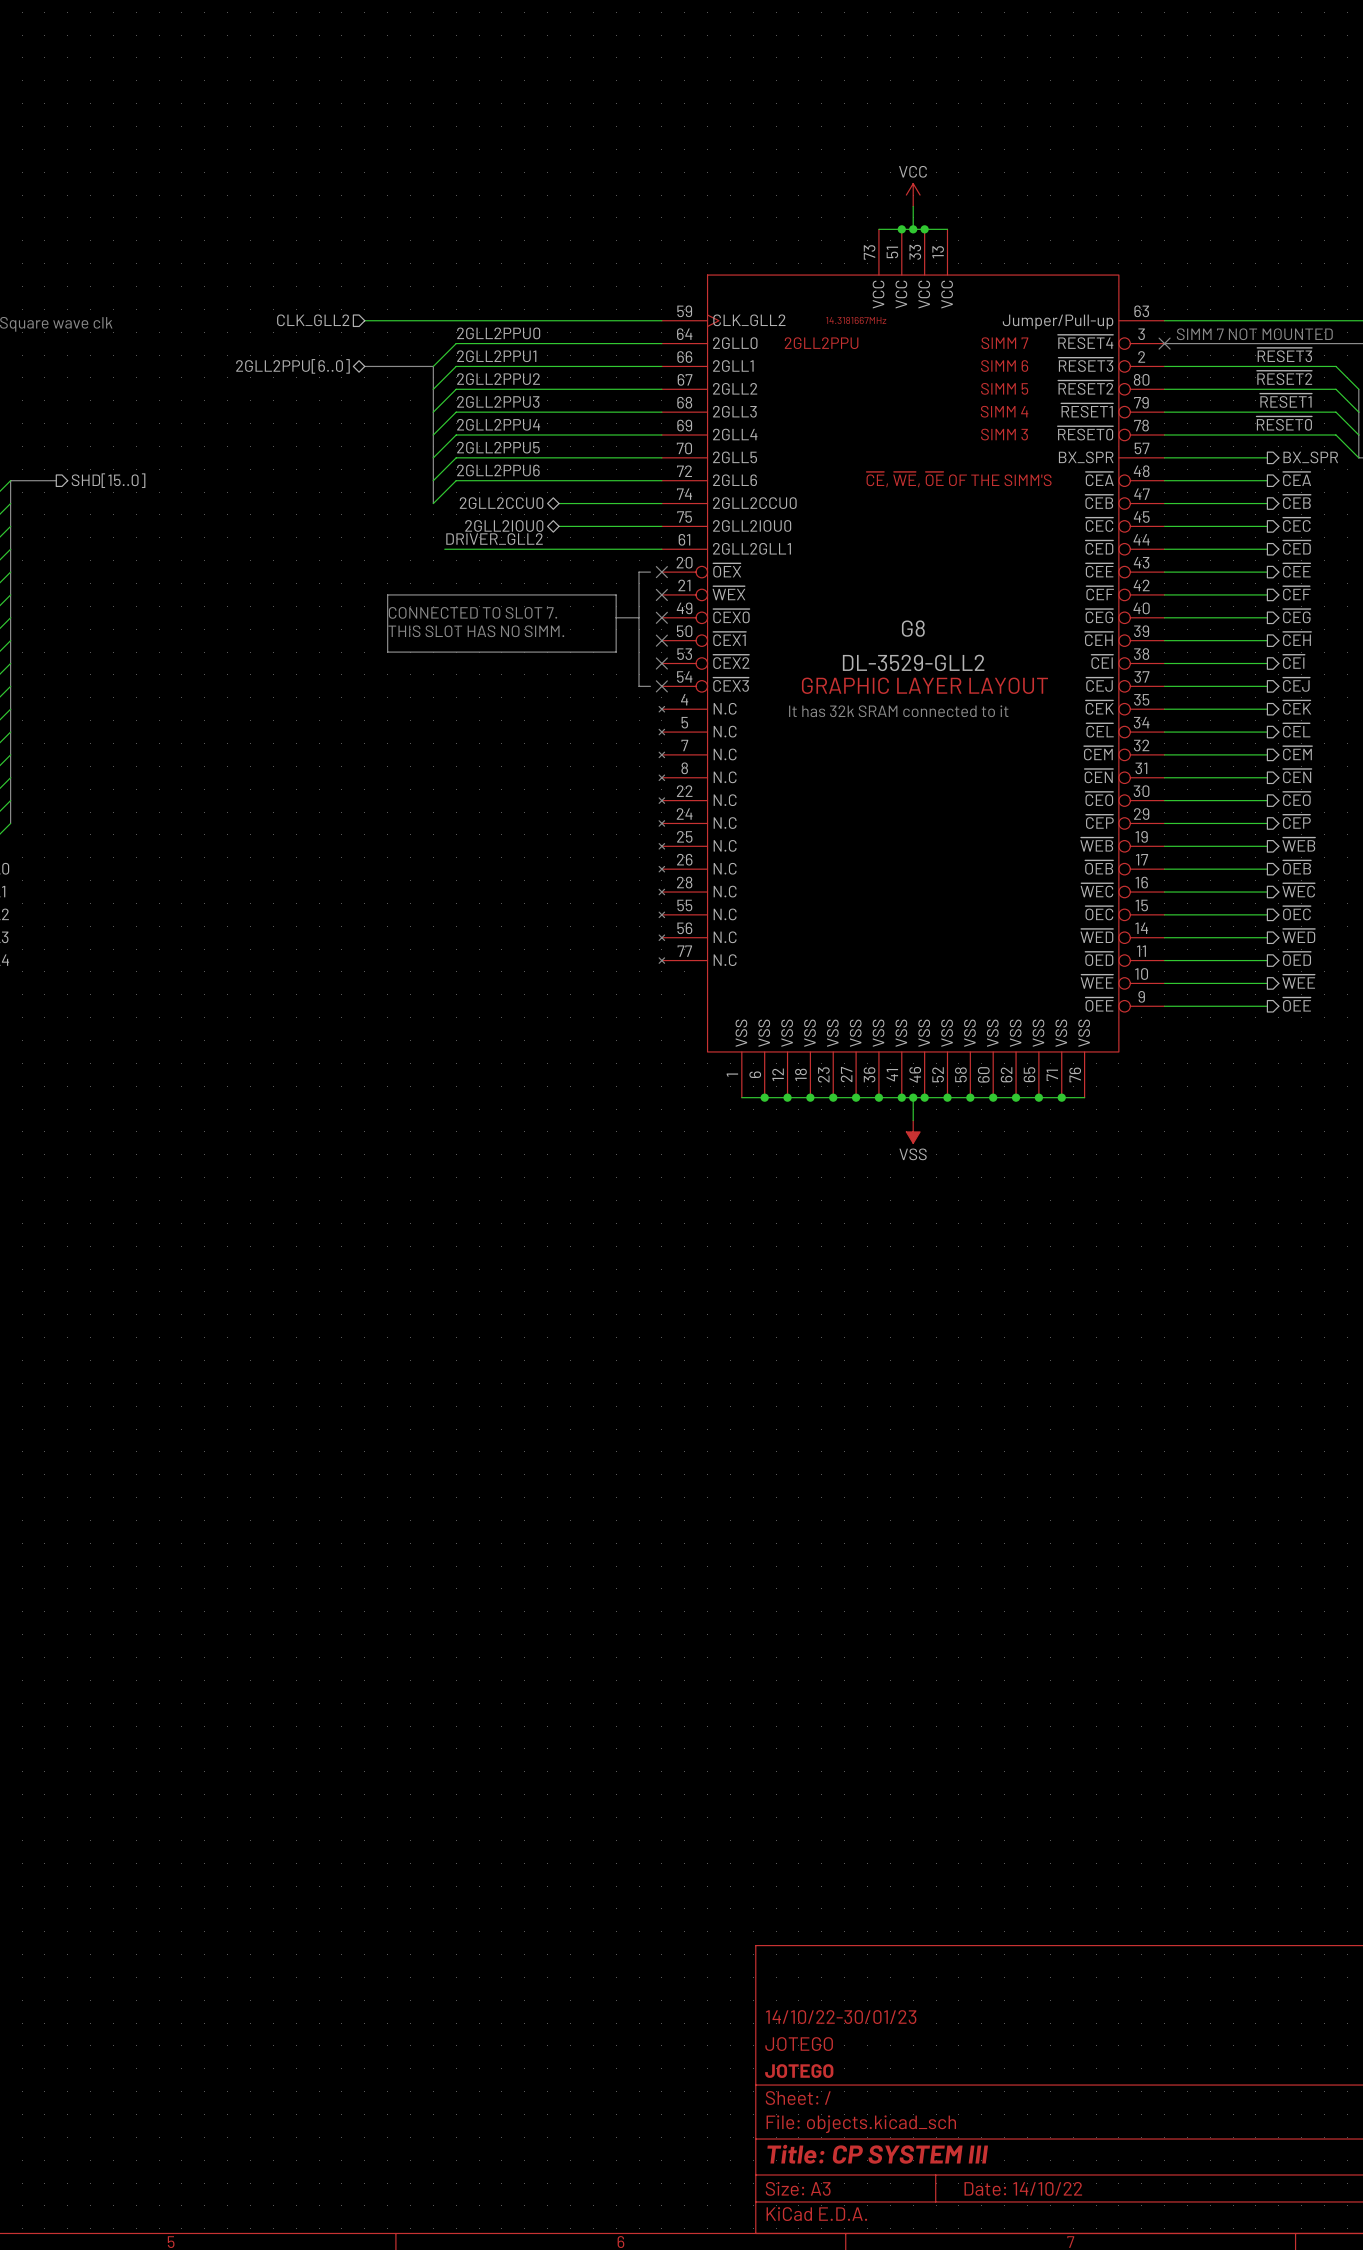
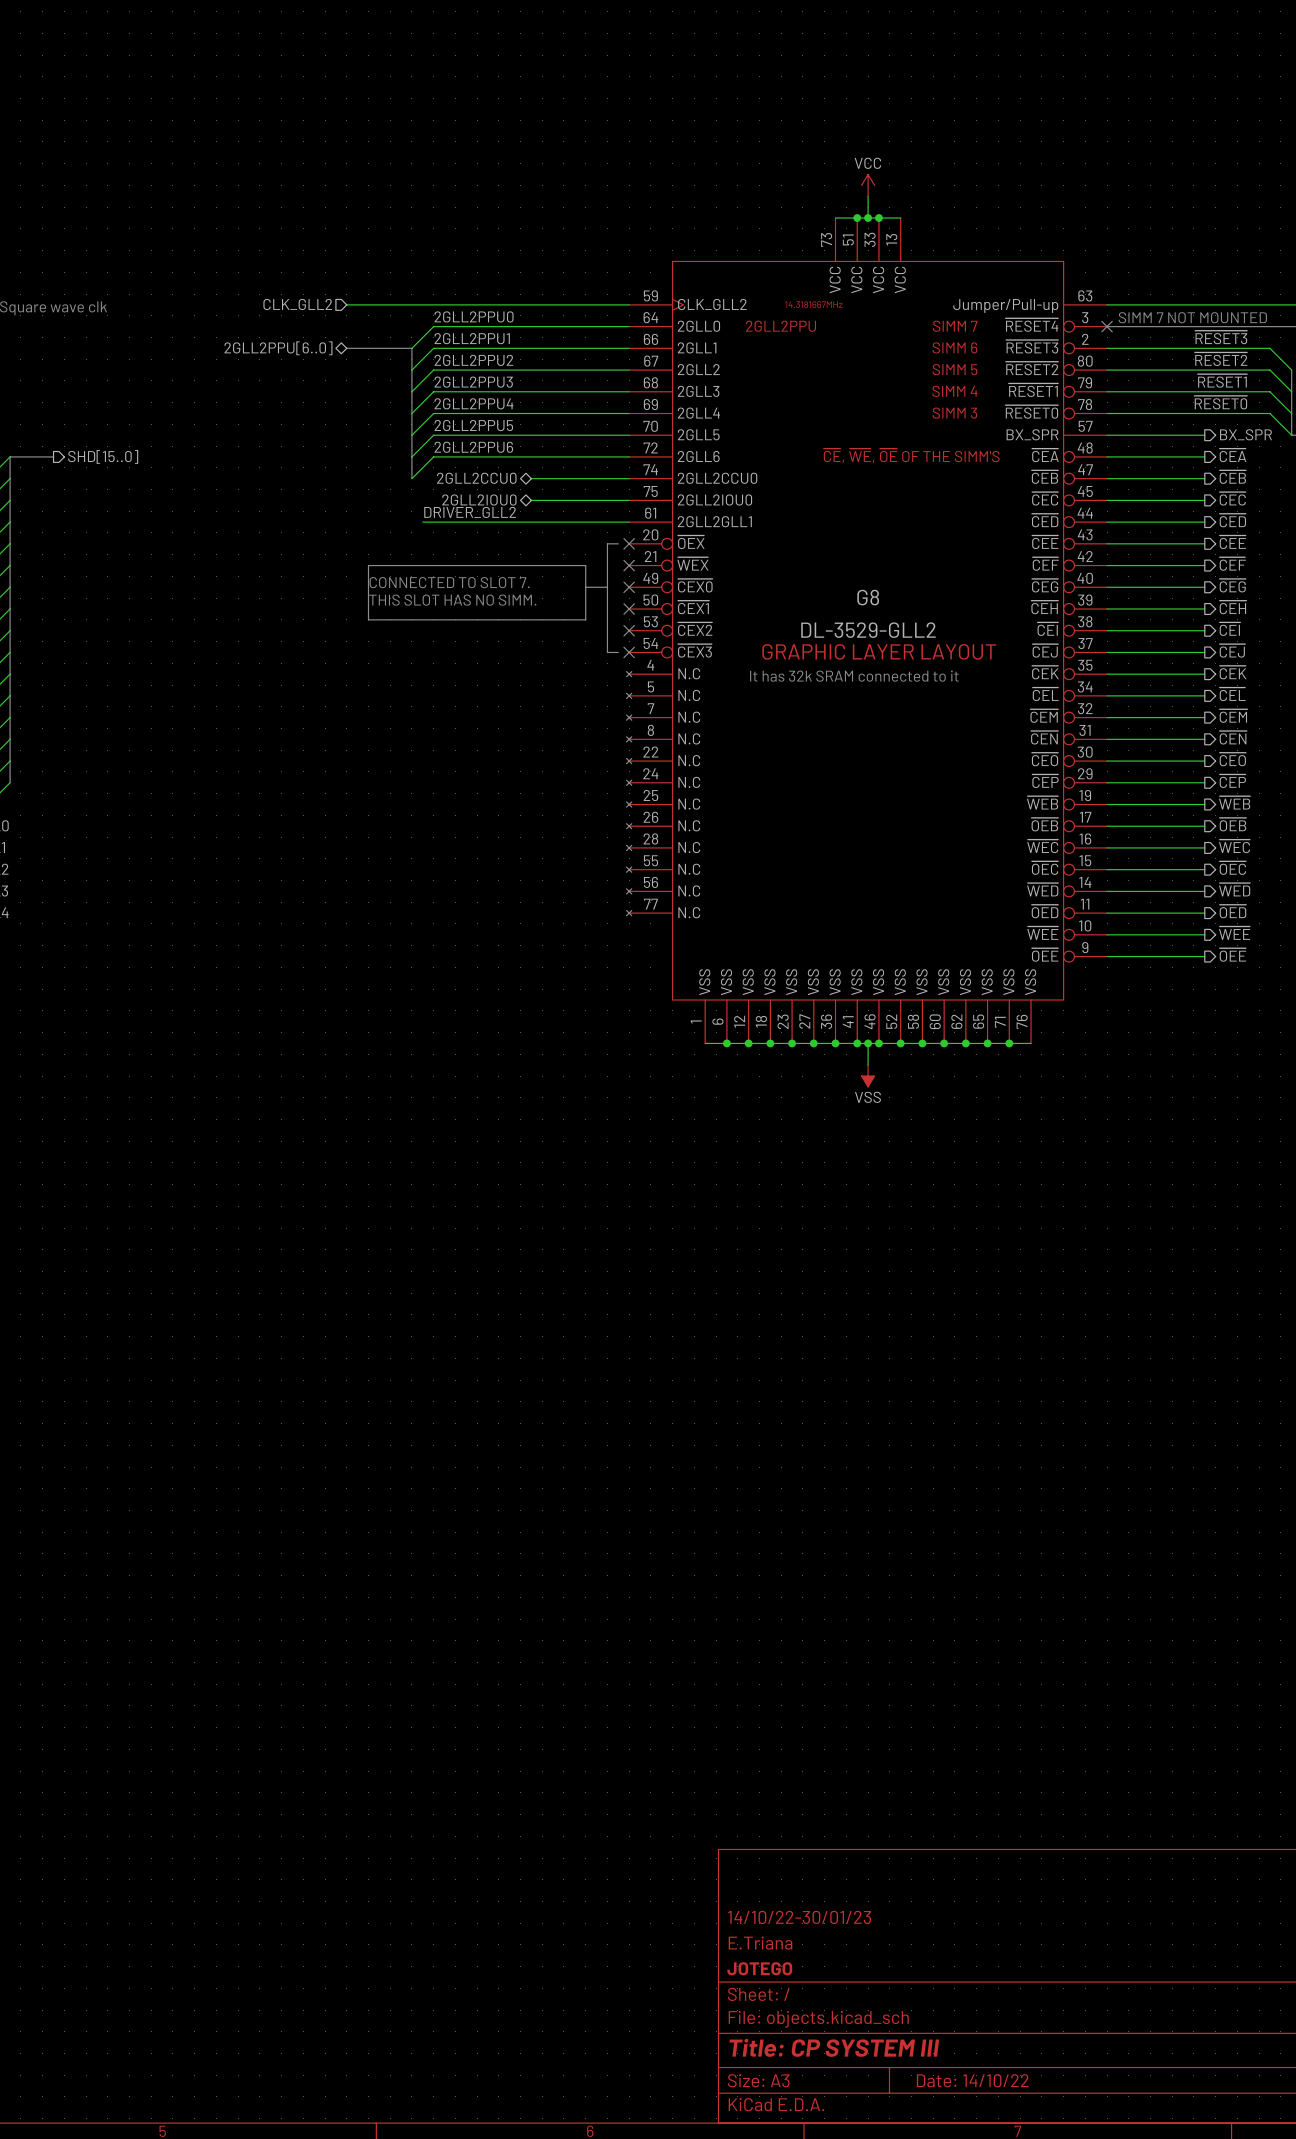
title block: JOTEGO (799, 2044) -> E.Triana (760, 1943)

